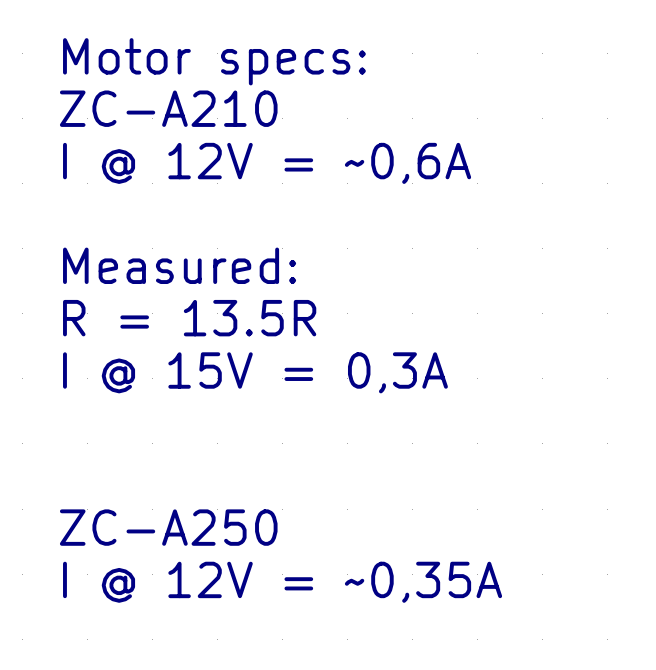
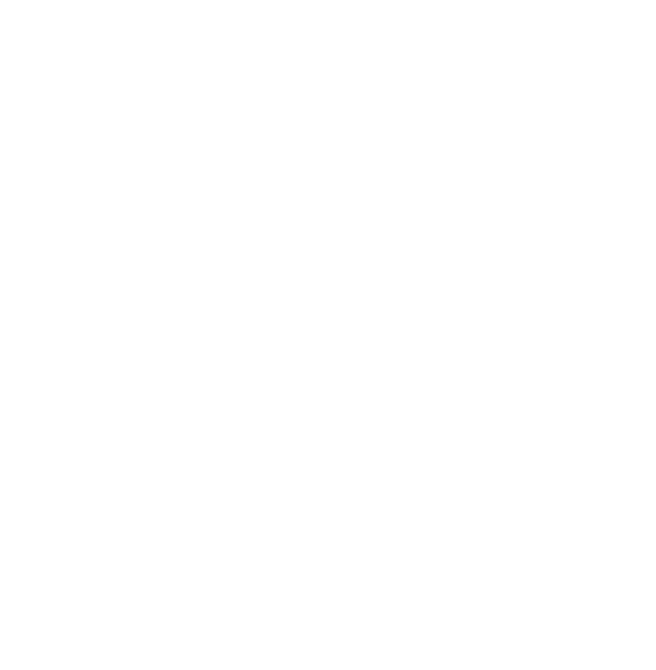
text: Motor specs: (214, 61) -> none
text: ZC-A210 (168, 108) -> none
text: I @ 12V = ~0,6A (267, 163) -> none
text: Measured: (179, 265) -> none
text: R = 13.5R (189, 318) -> none
text: I @ 15V = 0,3A (255, 372) -> none
text: ZC-A250 (168, 527) -> none
text: I @ 12V = ~0,35A (282, 582) -> none

